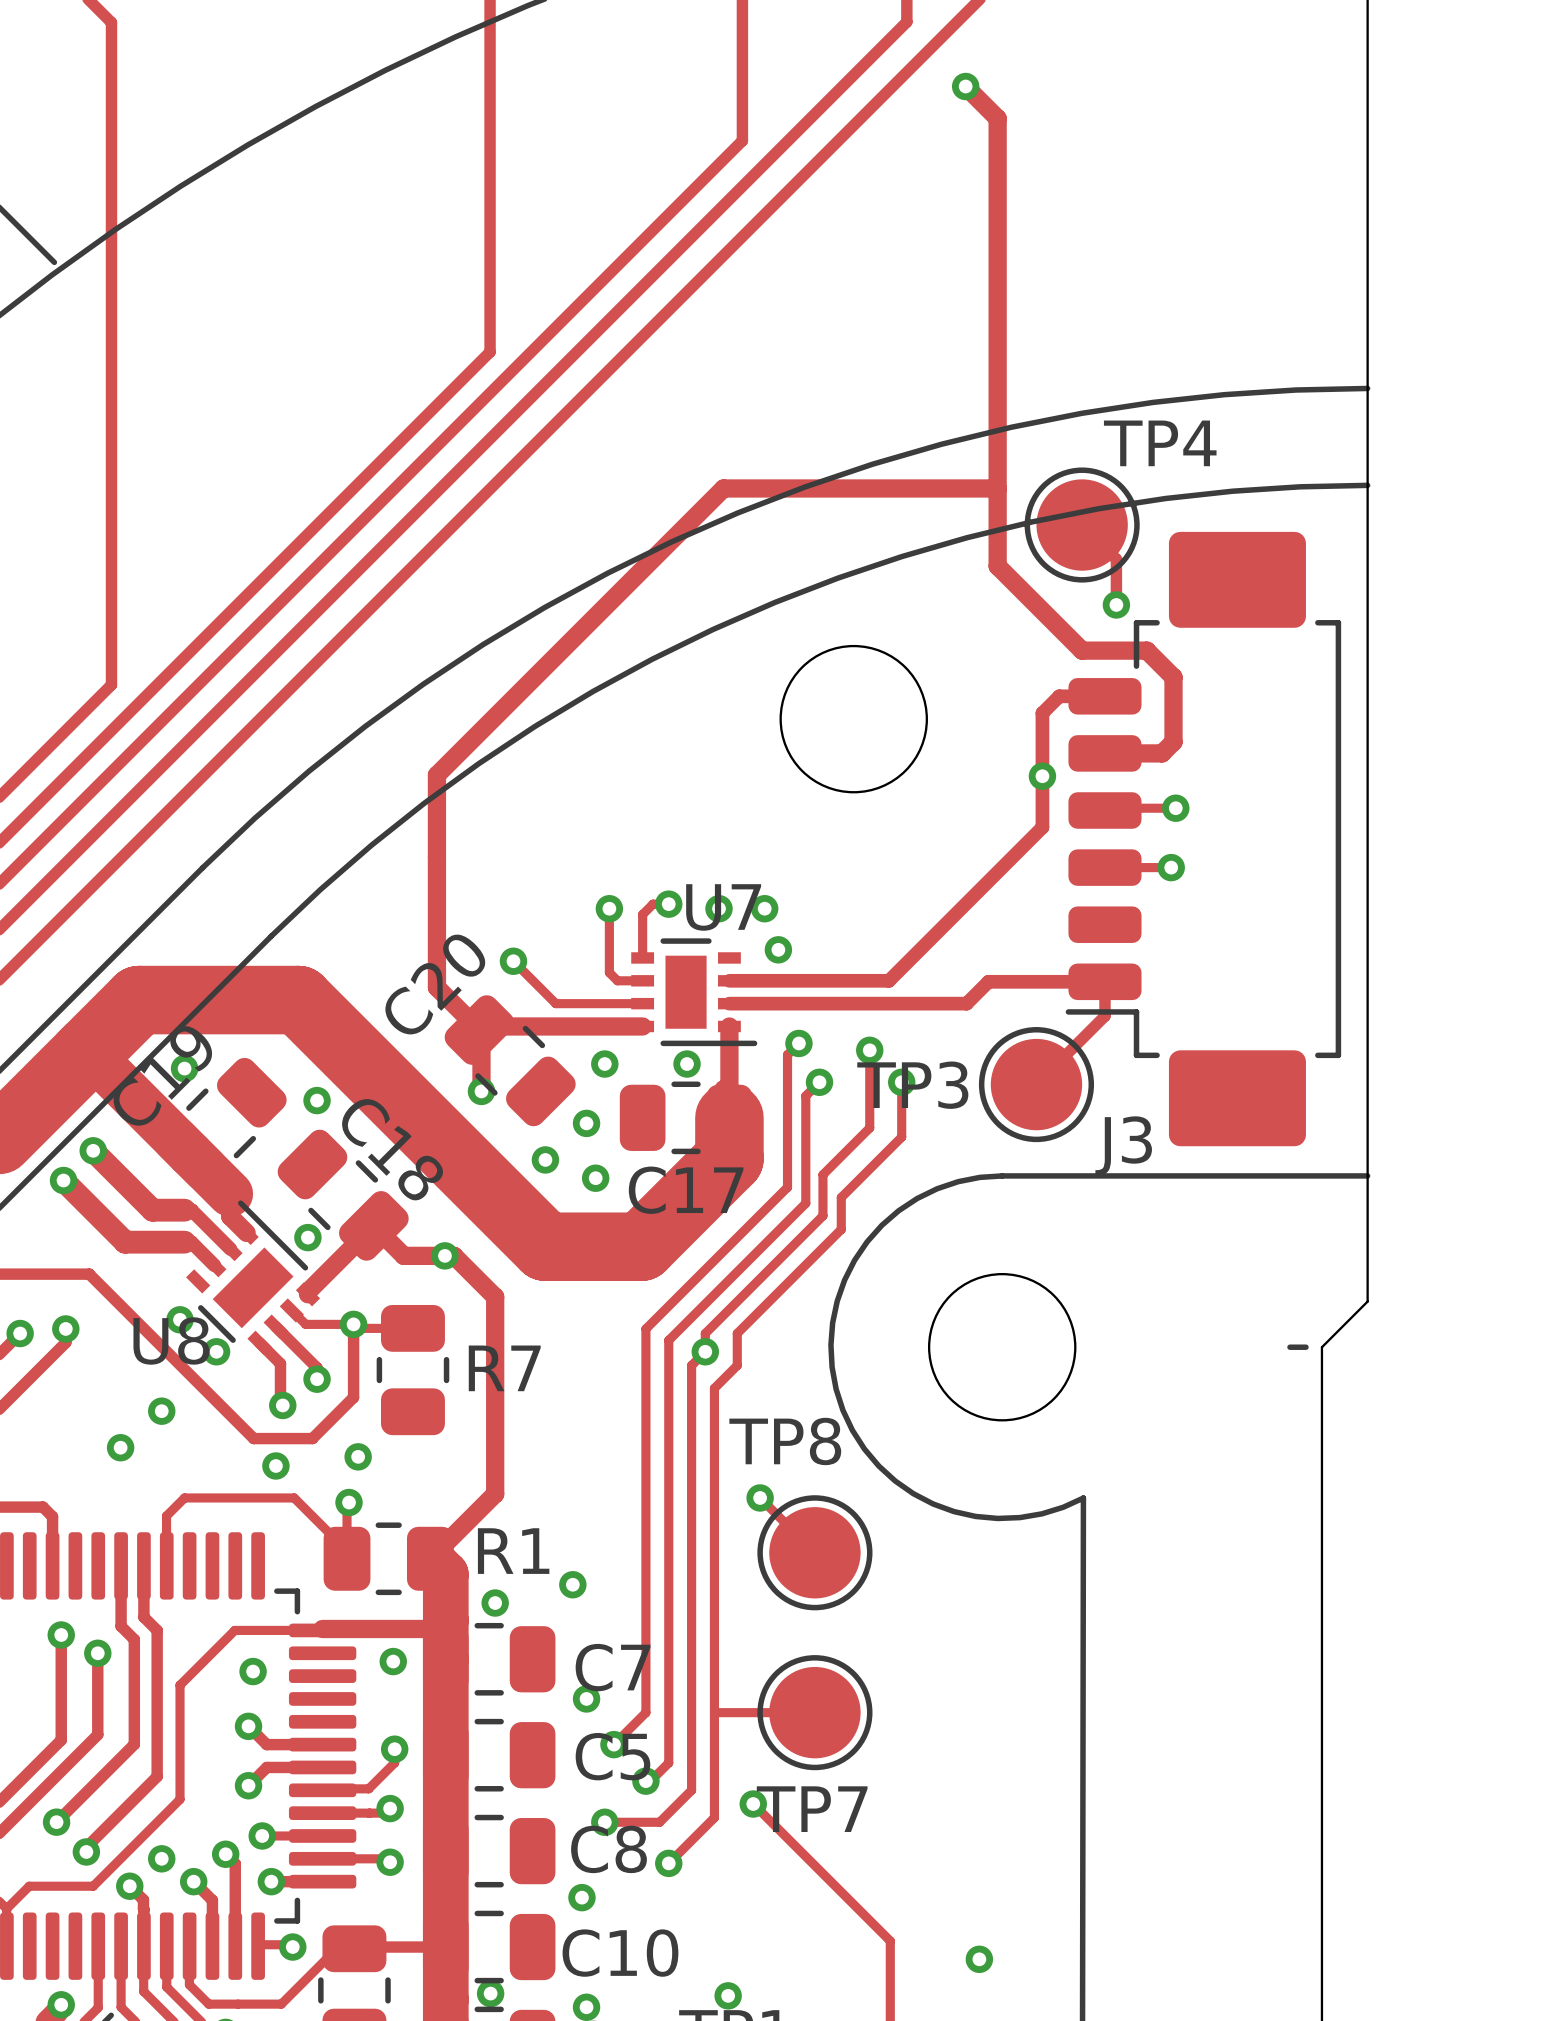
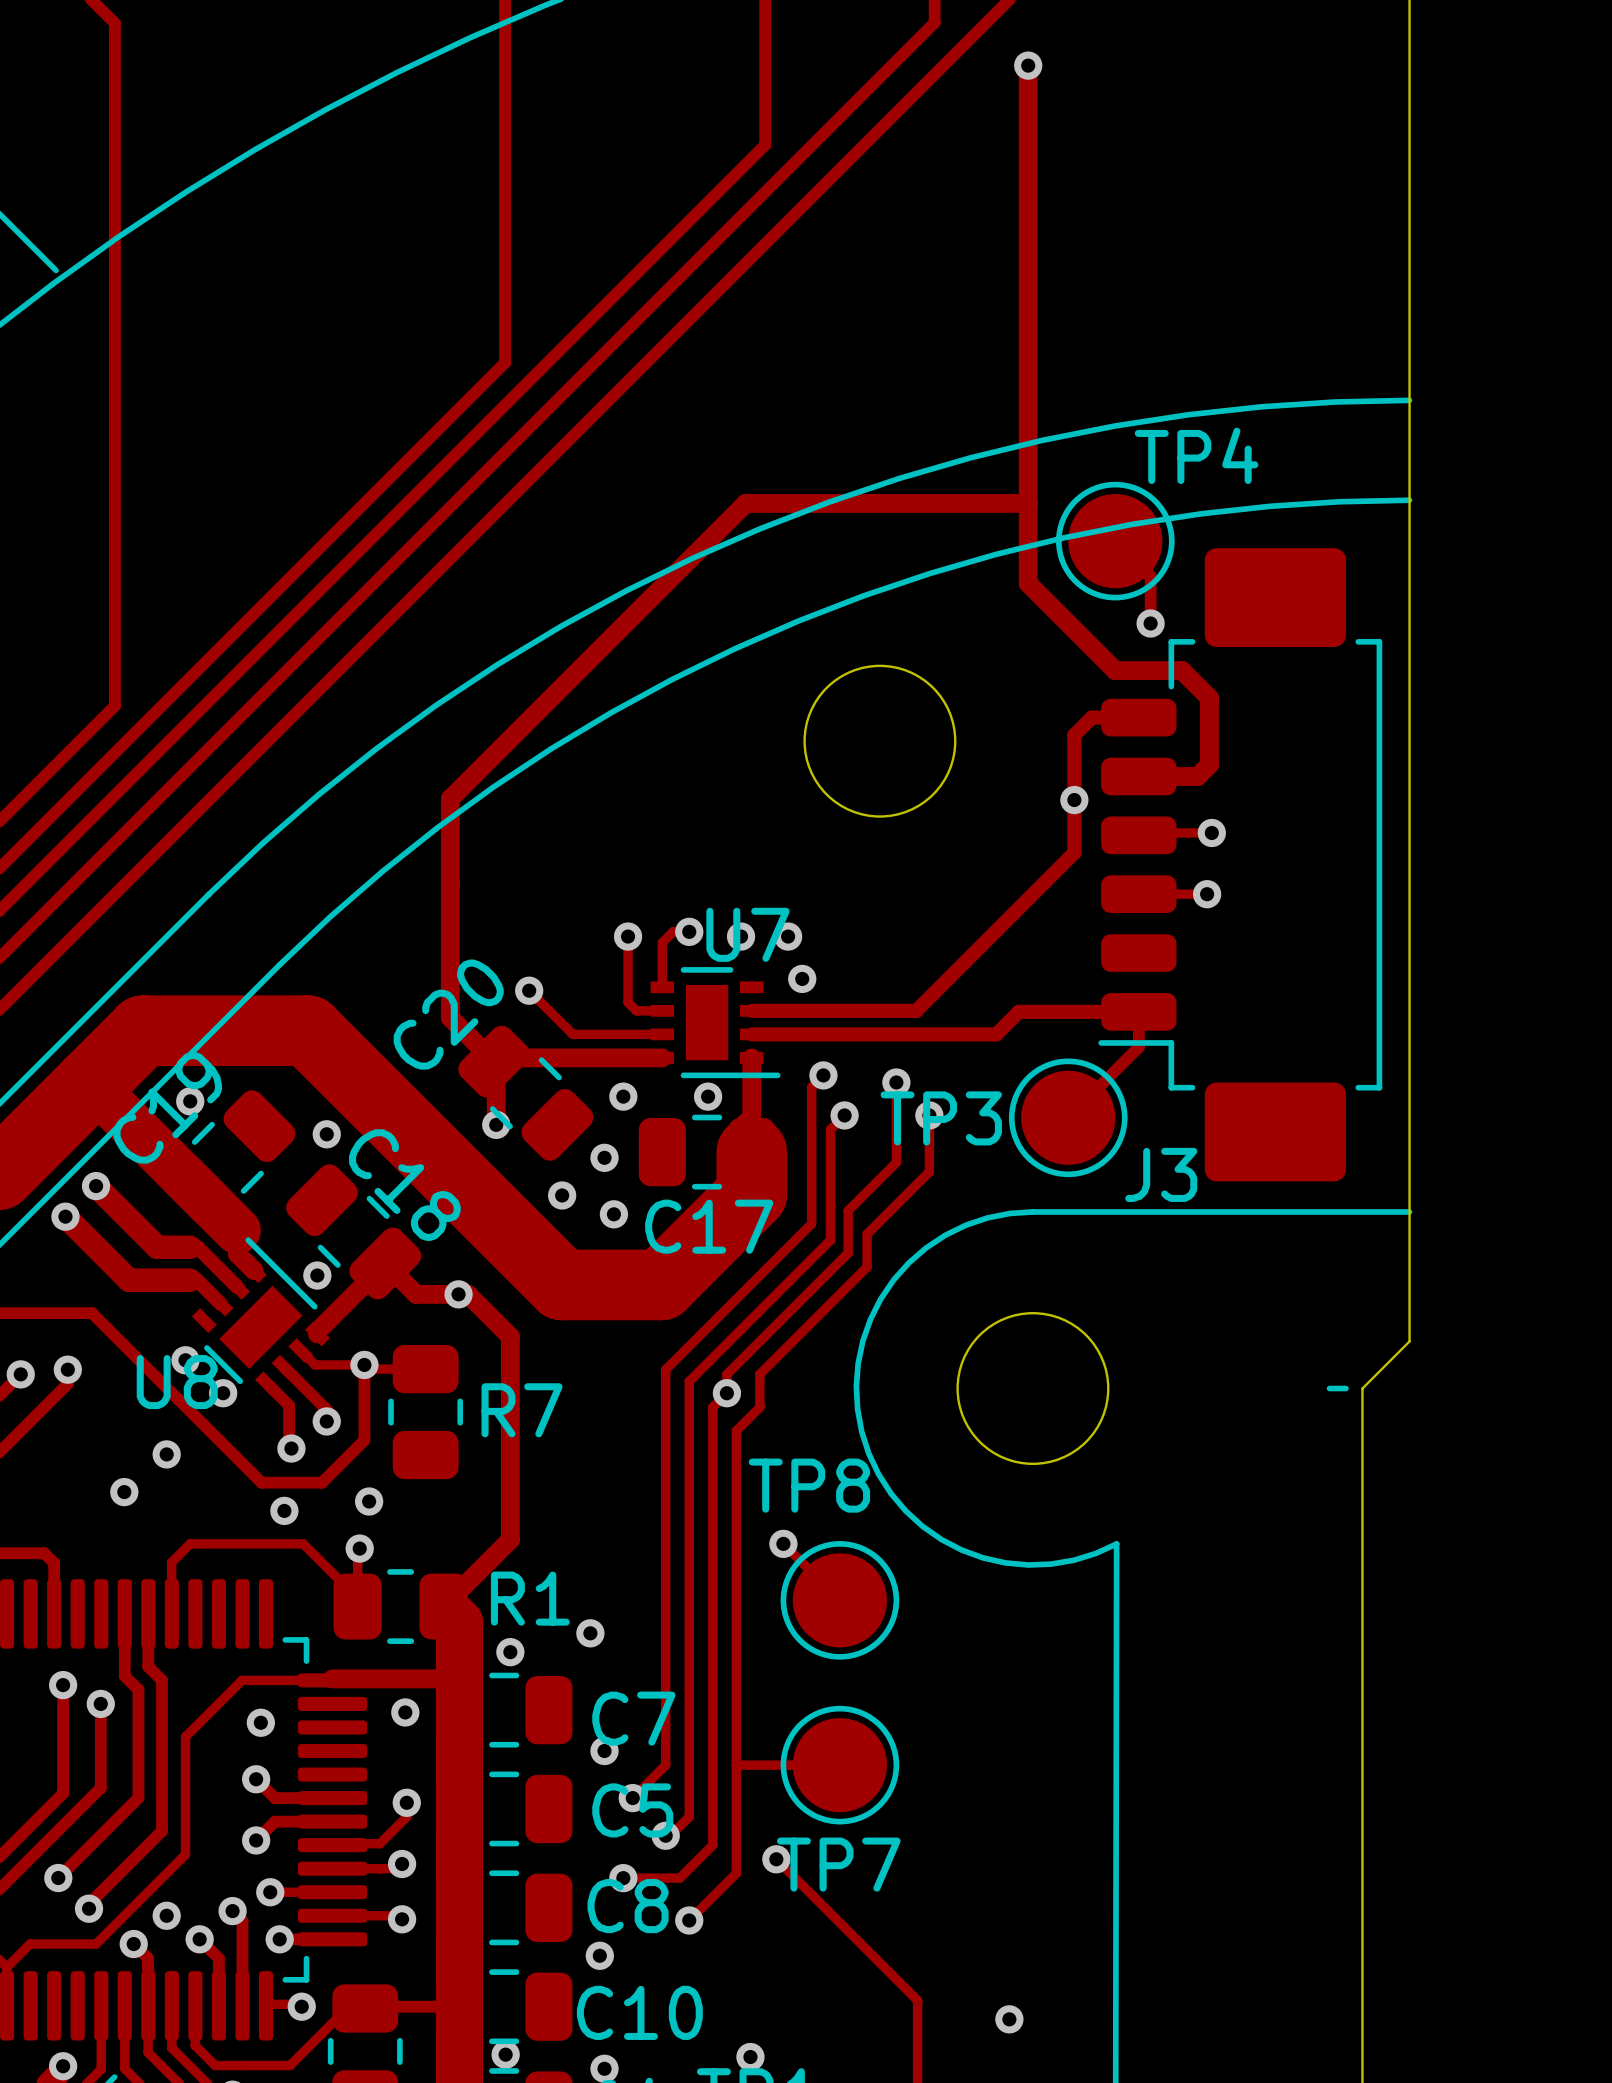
track: (965, 86) (997, 118) -> (1028, 65) (1028, 122)
via position: (965, 86) -> (1028, 65)

